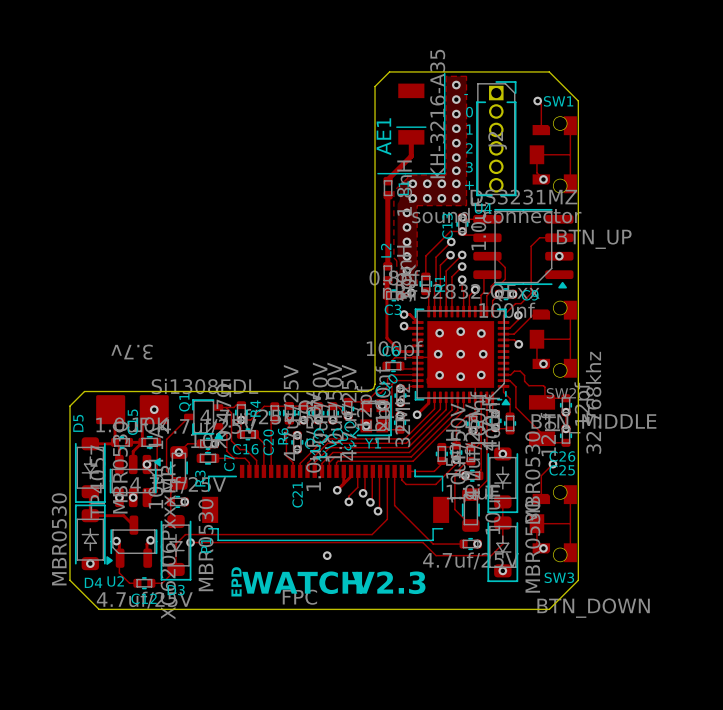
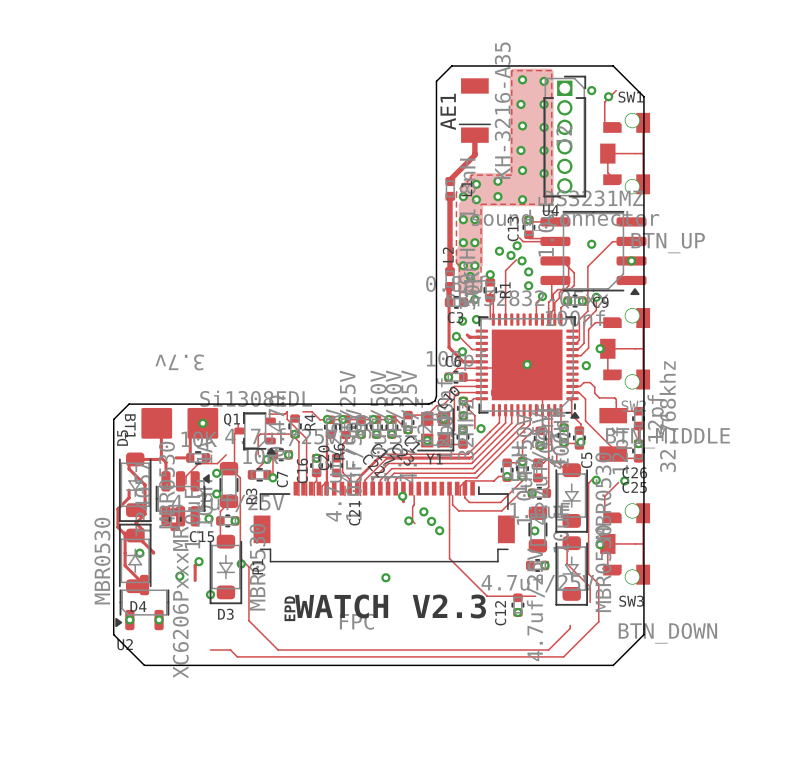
board edge: (542, 71) (549, 71) (578, 101) (578, 580) (549, 609) (99, 609) (70, 580) -> (613, 65) (643, 96) (643, 634) (613, 665) (144, 665) (113, 634) (113, 603)
line: (444, 73) (444, 173) (377, 173) -> none
zone outline: (466, 76) (466, 205) (417, 205) -> (533, 70) (551, 70) (551, 204) (481, 204) (481, 207)
via: none -> (544, 81)
text: - (466, 94) -> none
via: none -> (591, 90)
track: none -> (616, 90) (604, 102) (604, 127)
via: (456, 99) -> none
track: (537, 101) (541, 104) (541, 130) -> none
via: none -> (521, 104)
via: none -> (544, 104)
text: 0 (469, 112) -> none
via: (456, 114) -> none
text: 1 (469, 129) -> none
via: none -> (544, 127)
AE1 name position: AE1 (383, 136) -> AE1 (448, 111)
via: (456, 143) -> none
text: 2 (469, 148) -> none
via: none -> (521, 150)
via: none -> (544, 150)
via: (456, 157) -> none
text: 3 (469, 167) -> none
via: none -> (544, 173)
via: (543, 179) -> none
via: none -> (497, 181)
via: (427, 183) -> none
via: (441, 183) -> none
via: (456, 183) -> none
text: + (469, 185) -> none
via: none -> (463, 196)
via: none -> (497, 196)
via: (427, 198) -> none
via: (441, 198) -> none
via: (406, 212) -> none
via: none -> (463, 219)
via: none -> (474, 219)
via: (406, 227) -> none
track: (462, 231) (450, 231) (425, 256) (425, 276) -> none
via: (462, 231) -> none
track: none -> (519, 237) (523, 241) (547, 241)
track: none -> (623, 241) (612, 241) (587, 266) (587, 311) (579, 319) (579, 339) (575, 343)
track: (559, 237) (539, 237) (531, 246) (531, 293) (520, 303) (515, 303) (503, 315) (503, 322) -> none
via: none -> (463, 242)
via: none -> (474, 242)
via: none -> (591, 244)
via: (406, 241) -> none
track: (451, 241) (436, 257) (435, 311) -> none
via: none -> (499, 251)
via: none -> (511, 255)
track: (462, 254) (446, 270) (446, 311) -> none
via: (462, 254) -> none
via: (450, 255) -> none
via: (406, 256) -> none
via: none -> (522, 260)
track: none -> (547, 261) (564, 261) (568, 265) (568, 285) (564, 289) (557, 289) (553, 294) (551, 319)
via: none -> (463, 265)
via: none -> (474, 265)
track: (462, 266) (451, 276) (451, 311) -> none
via: none -> (490, 274)
track: (462, 279) (463, 311) -> none
track: none -> (493, 290) (490, 293) (490, 319)
via: none -> (596, 297)
via: none -> (476, 319)
via: none -> (462, 321)
track: (404, 314) (409, 314) (417, 322) -> none
via: (404, 314) -> none
track: (533, 314) (514, 334) (506, 334) -> (604, 322) (595, 322) (588, 329) (588, 348) (580, 355) (569, 355)
track: (518, 315) (518, 319) (509, 328) (503, 328) -> none
via: (518, 315) -> none
via: (404, 326) -> none
track: none -> (456, 336) (459, 336) (472, 349) (478, 349)
via: none -> (456, 336)
via: (460, 331) -> none
via: (439, 333) -> none
via: (481, 333) -> none
track: (508, 339) (514, 339) (518, 344) -> (577, 349) (584, 343) (584, 322) (596, 310) (596, 297)
via: none -> (600, 348)
via: none -> (462, 351)
via: (518, 344) -> none
via: (438, 354) -> none
via: (483, 354) -> none
via: none -> (586, 365)
via: (543, 363) -> none
via: none -> (448, 377)
via: (439, 375) -> none
via: (481, 375) -> none
via: (460, 376) -> none
track: none -> (569, 398) (571, 401) (571, 414) (580, 424) (580, 427)
track: (503, 386) (503, 392) (510, 398) (510, 416) -> none
track: none -> (463, 401) (460, 401) (474, 415) (474, 428)
track: (428, 397) (428, 403) (417, 414) -> none
track: none -> (551, 410) (551, 449) (556, 454) (556, 461) (562, 467) (574, 467)
track: (487, 397) (487, 480) (470, 494) -> none
track: none -> (268, 414) (284, 414) (287, 411) (287, 419) (306, 438) (306, 495)
Q1 name rotation: 0° (185, 402) -> 90° clockwise (231, 419)
track: (241, 405) (236, 405) (233, 407) (218, 407) -> none
track: (264, 406) (250, 419) (240, 420) (240, 434) -> (319, 419) (311, 411) (302, 411)
via: none -> (327, 419)
via: none -> (342, 419)
via: none -> (373, 419)
via: none -> (388, 419)
track: (226, 407) (231, 412) (231, 440) (240, 449) (245, 449) (256, 460) (256, 471) -> none
track: none -> (238, 424) (238, 430) (234, 433) (234, 472) (240, 477) (240, 558) (248, 567) (248, 620) (278, 650) (548, 650) (570, 628) (570, 625)
BT1 name: none -> BT1 (130, 426)
via: (566, 412) -> none
track: (189, 416) (166, 439) (166, 471) (178, 483) -> none
track: none -> (327, 434) (327, 480) (321, 486) (321, 495)
track: (218, 426) (226, 435) (226, 451) (234, 458) -> none
via: none -> (580, 442)
C16 rotation: 0° (247, 434) -> 90° clockwise (316, 465)
C16 position: (247, 434) -> (316, 465)
track: (254, 434) (263, 443) (263, 471) -> none
via: (297, 435) -> none
track: none -> (226, 454) (217, 463) (198, 463) (185, 476) (185, 484)
track: none -> (258, 454) (258, 436) (260, 434) (291, 434) (298, 441) (298, 495)
track: none -> (273, 454) (272, 477)
via: none -> (288, 454)
track: none -> (471, 457) (378, 457) (360, 475) (360, 495)
C15 rotation: 0° (122, 442) -> 90° clockwise (175, 519)
C15 position: (122, 442) -> (175, 519)
track: (142, 442) (133, 451) (133, 464) -> none
track: (157, 442) (157, 491) (151, 497) (146, 497) -> none
via: none -> (316, 458)
C21 position: (297, 442) -> (336, 465)
track: (201, 443) (187, 443) (178, 452) -> none
C7 position: (207, 443) -> (281, 454)
C5 name: none -> C5 (586, 460)
track: none -> (129, 460) (129, 468) (145, 484) (145, 514) (136, 523) (142, 530) (142, 541) (153, 553)
via: none -> (522, 461)
via: (297, 449) -> none
via: (178, 452) -> none
via: (502, 453) -> none
via: none -> (216, 473)
track: none -> (316, 472) (314, 495)
track: (215, 458) (245, 458) (249, 462) (249, 471) -> none
track: none -> (507, 476) (498, 476) (494, 480) (465, 480) (460, 486) (460, 495)
via: none -> (507, 476)
track: (441, 460) (441, 463) (434, 471) (409, 471) -> none
via: none -> (272, 477)
track: (470, 461) (467, 461) (454, 473) (454, 509) (470, 525) -> none
track: none -> (596, 480) (591, 480) (588, 483) (588, 573) (598, 584) (598, 621) (563, 656) (237, 656) (230, 650) (210, 650)
via: none -> (596, 480)
via: (146, 464) -> none
track: (552, 464) (541, 475) (541, 498) -> none
track: none -> (618, 482) (604, 496) (604, 517)
track: none -> (345, 486) (345, 495)
track: (351, 471) (351, 476) (337, 490) -> none
track: (357, 471) (357, 487) (348, 496) (348, 501) -> none
track: (364, 471) (364, 491) (363, 493) -> none
track: (372, 471) (372, 500) (370, 502) -> none
track: (379, 471) (378, 511) -> none
track: (394, 471) (394, 505) (433, 544) (463, 544) -> none
track: none -> (129, 490) (129, 497) (117, 509) (117, 527) (123, 533) (127, 533) (125, 535) (125, 565) (144, 585)
track: none -> (527, 492) (520, 492) (501, 510) (458, 510) (452, 504) (452, 495)
via: none -> (216, 494)
track: none -> (414, 495) (412, 521) (414, 523)
via position: (337, 490) -> (402, 496)
track: (90, 491) (90, 515) (123, 515) (133, 525) -> none
via: (119, 497) -> none
via: (133, 497) -> none
via: none -> (209, 518)
track: (502, 501) (502, 544) (491, 555) (436, 555) (422, 542) (190, 542) -> none
via: none -> (534, 530)
track: none -> (567, 531) (567, 563) (590, 587) (590, 602)
track: (387, 519) (372, 534) (185, 534) (176, 544) (176, 569) (162, 583) (151, 583) -> (449, 539) (449, 558) (487, 596) (535, 596)
via: none -> (600, 544)
via: none -> (139, 553)
track: (116, 541) (119, 544) (119, 573) (129, 583) (137, 583) -> none
via: (116, 541) -> none
U2 position: (131, 541) -> (142, 602)
via: (543, 548) -> none
via: none -> (179, 576)
via: (90, 563) -> none
via: (502, 570) -> none
via: none -> (210, 594)
C12 rotation: 0° (144, 583) -> 90° clockwise (517, 605)
C12 position: (144, 583) -> (517, 605)
via: none -> (517, 612)
via: none -> (129, 619)
via: none -> (159, 619)

